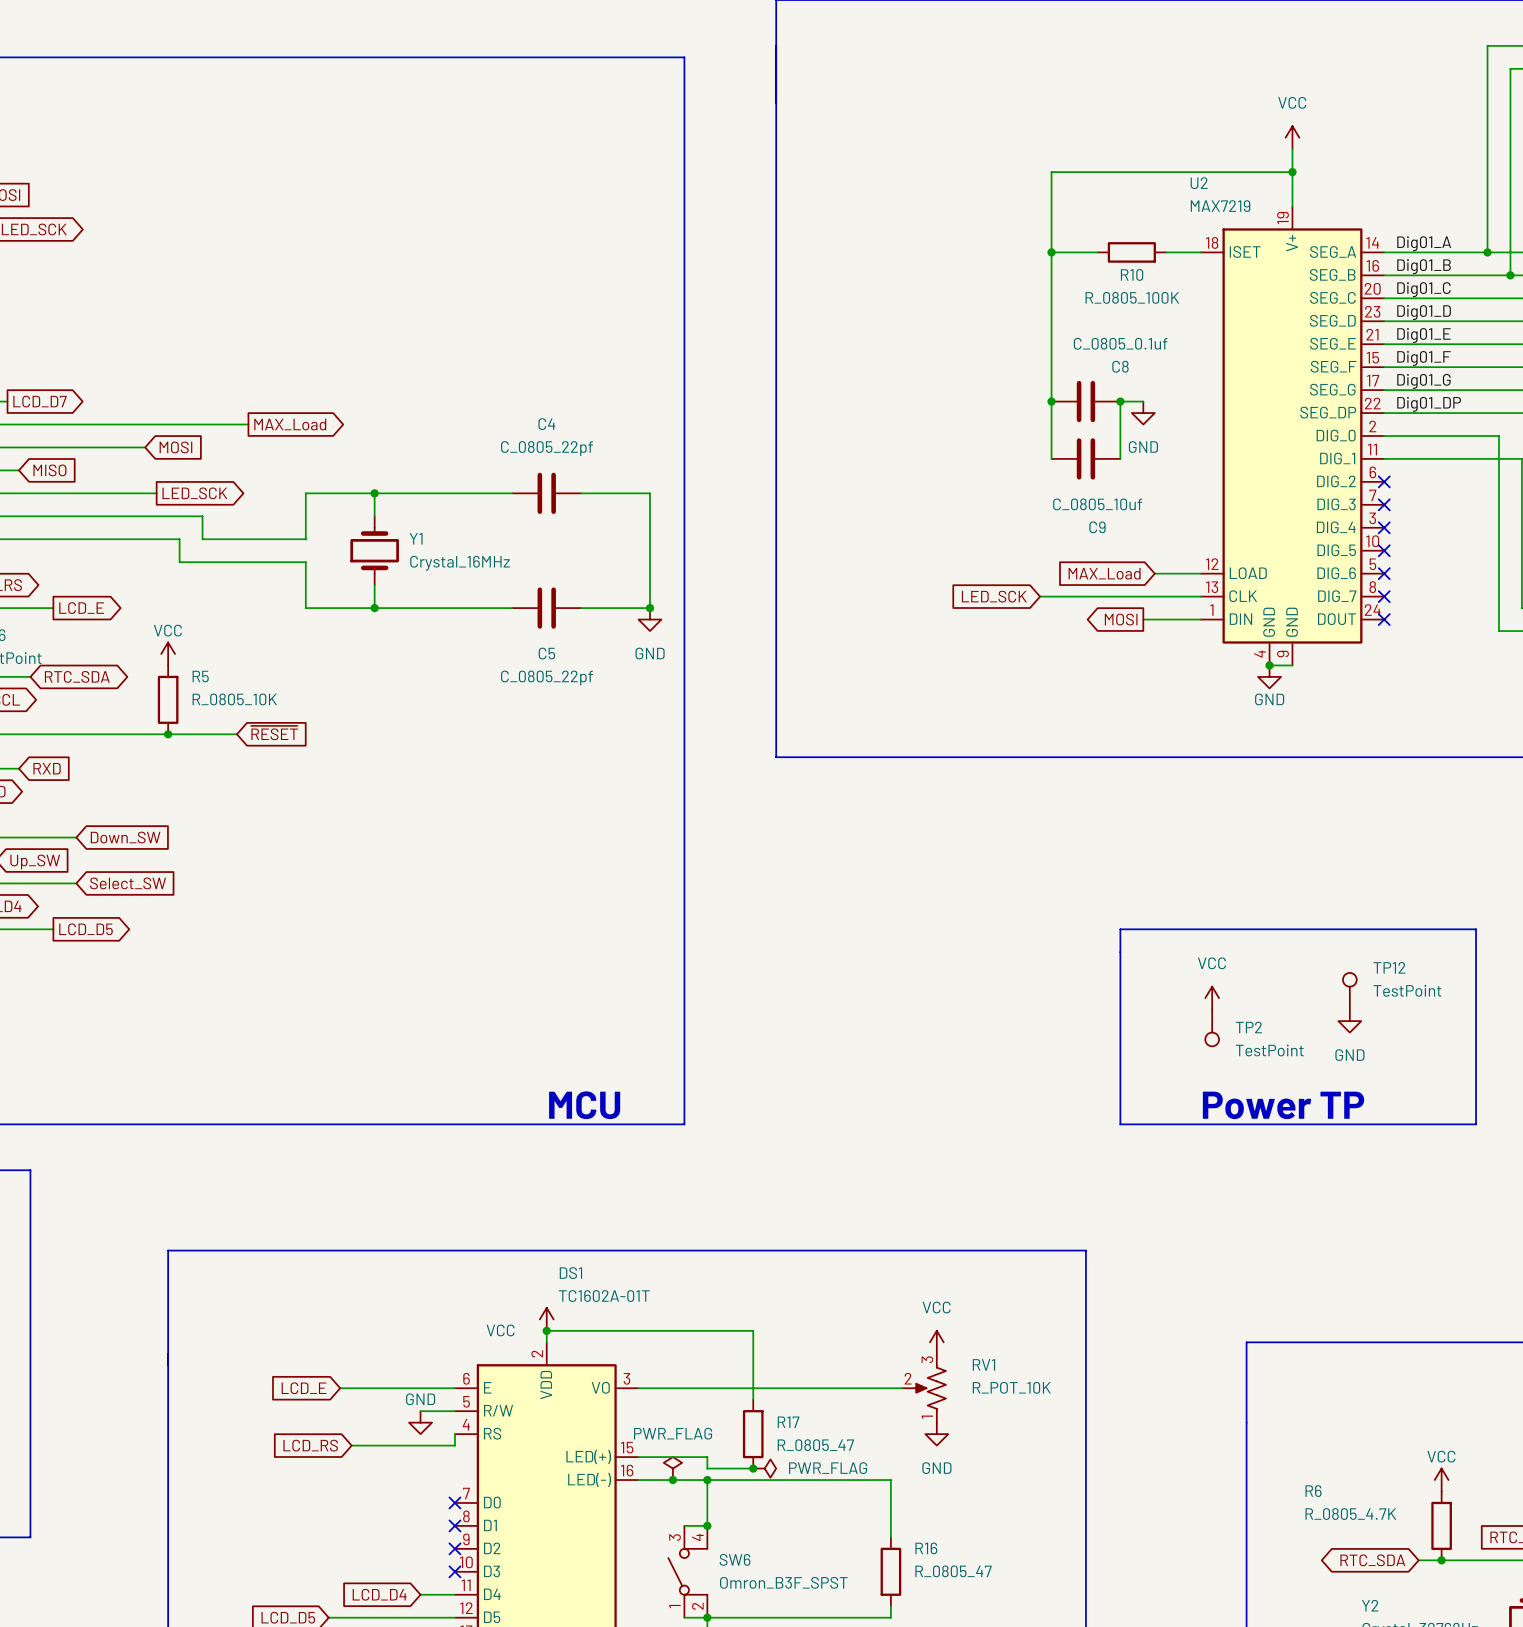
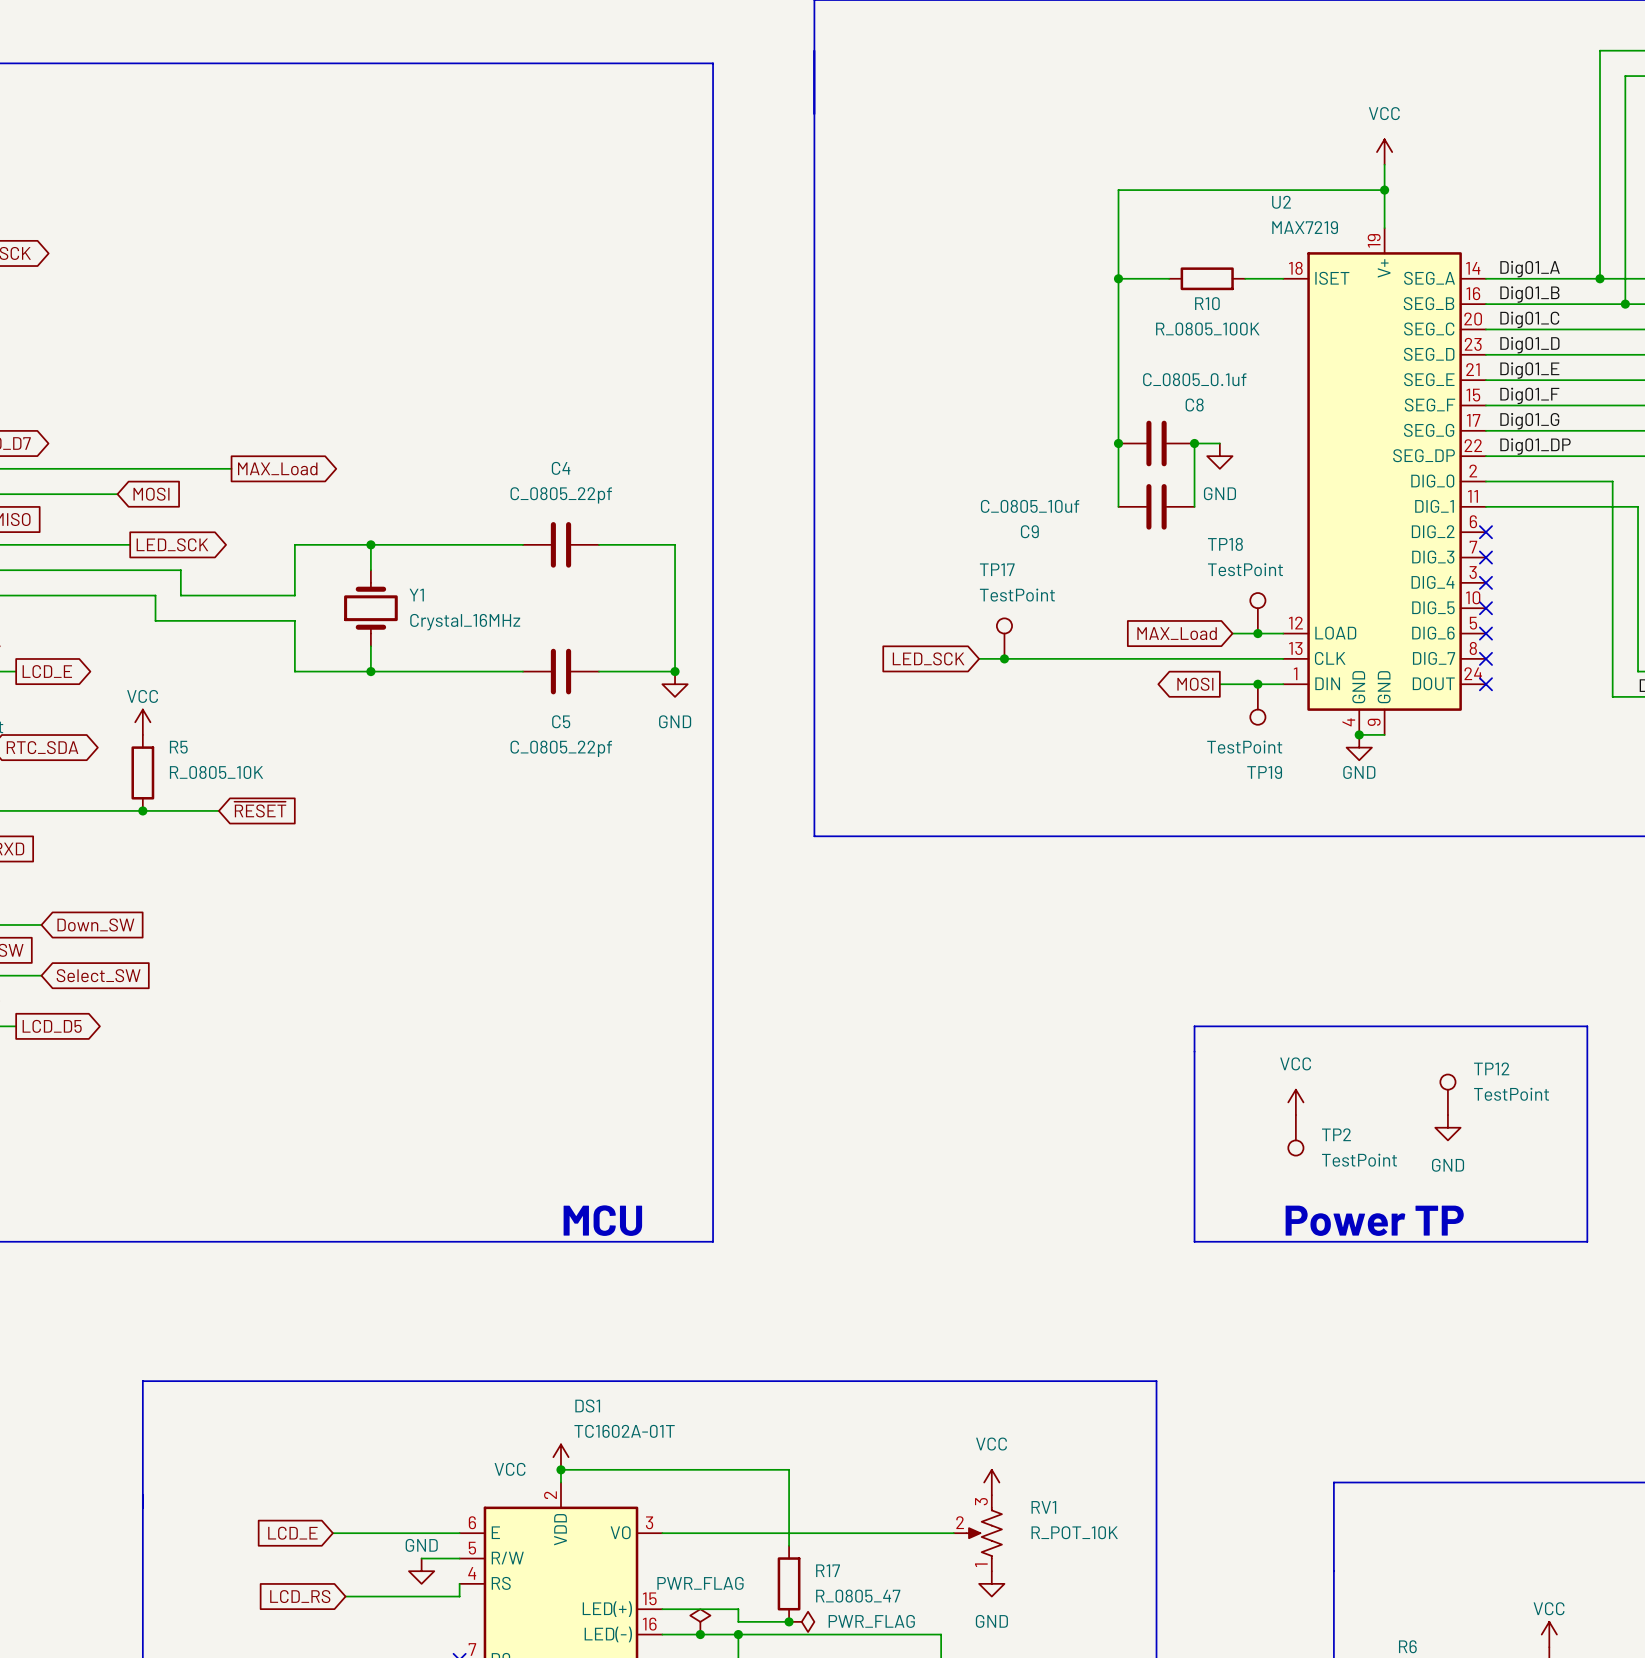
C9 value position: C_0805_10uf (1097, 504) -> C_0805_10uf (1030, 506)
C9 name position: C9 (1097, 527) -> C9 (1029, 531)
TP18: none -> TestPoint (1257, 613)
junction: none -> (1257, 633)
TP17: none -> TestPoint (1004, 638)
wire: none -> (979, 658) (1105, 658)
junction: none -> (1004, 658)
global label position: LED_SCK (994, 596) -> LED_SCK (928, 658)
junction: none -> (1257, 684)
TP19: none -> TestPoint (1257, 704)

